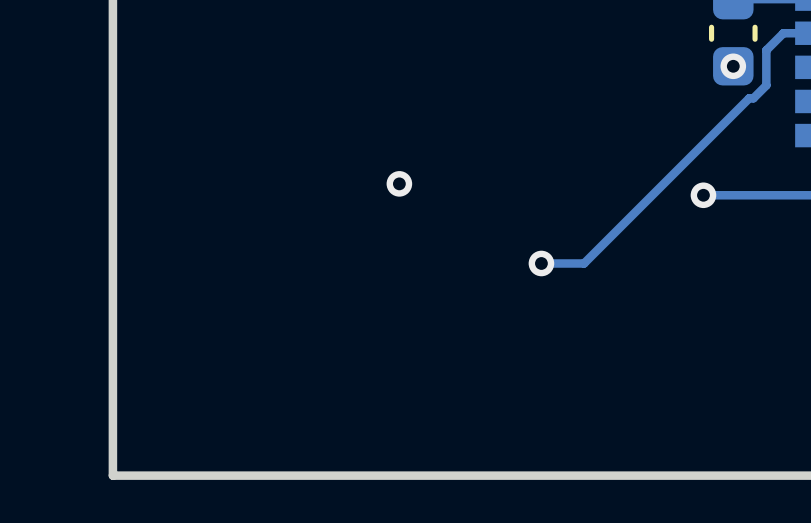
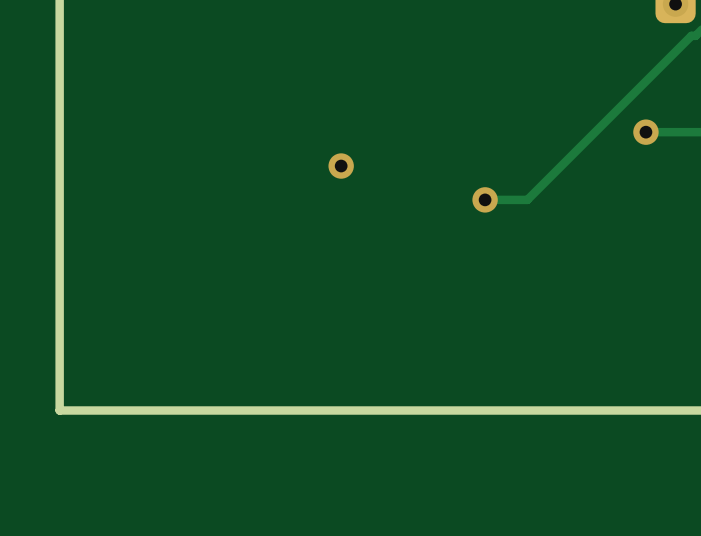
via position: (399, 183) -> (341, 166)

